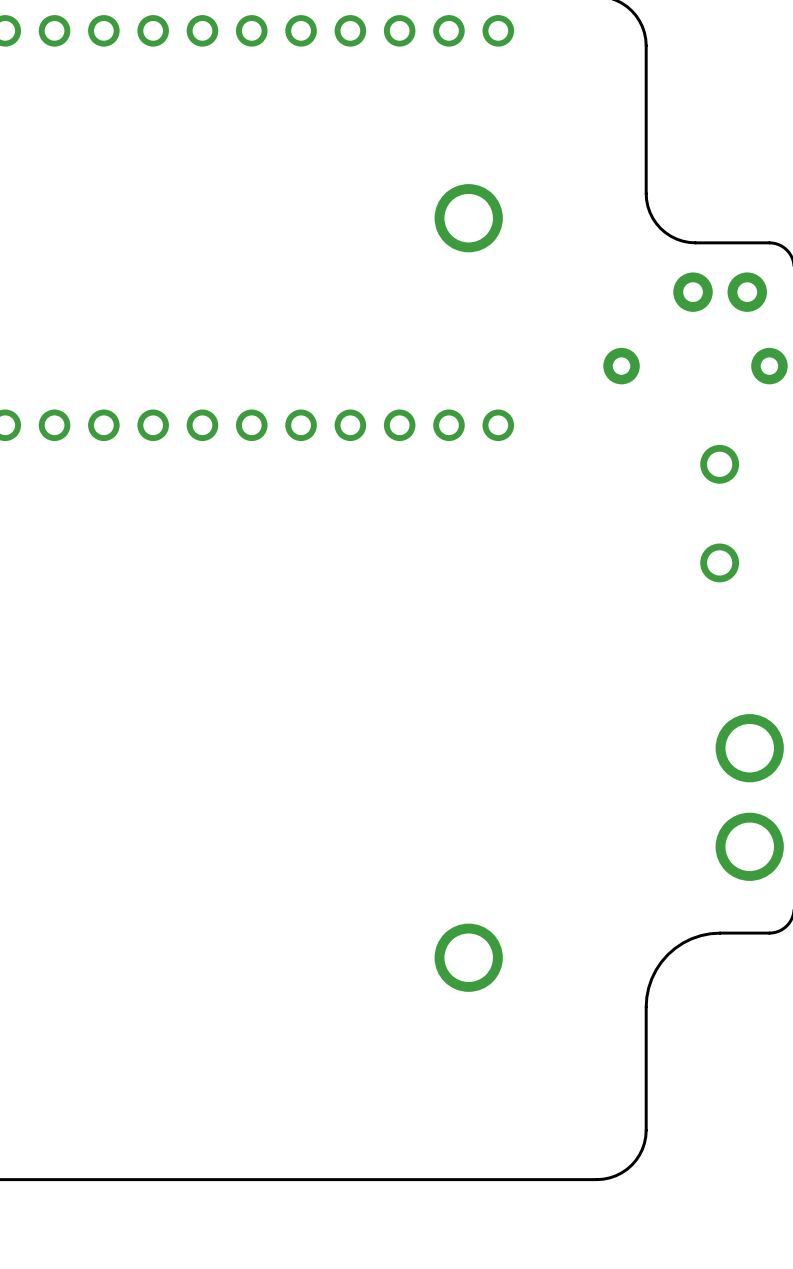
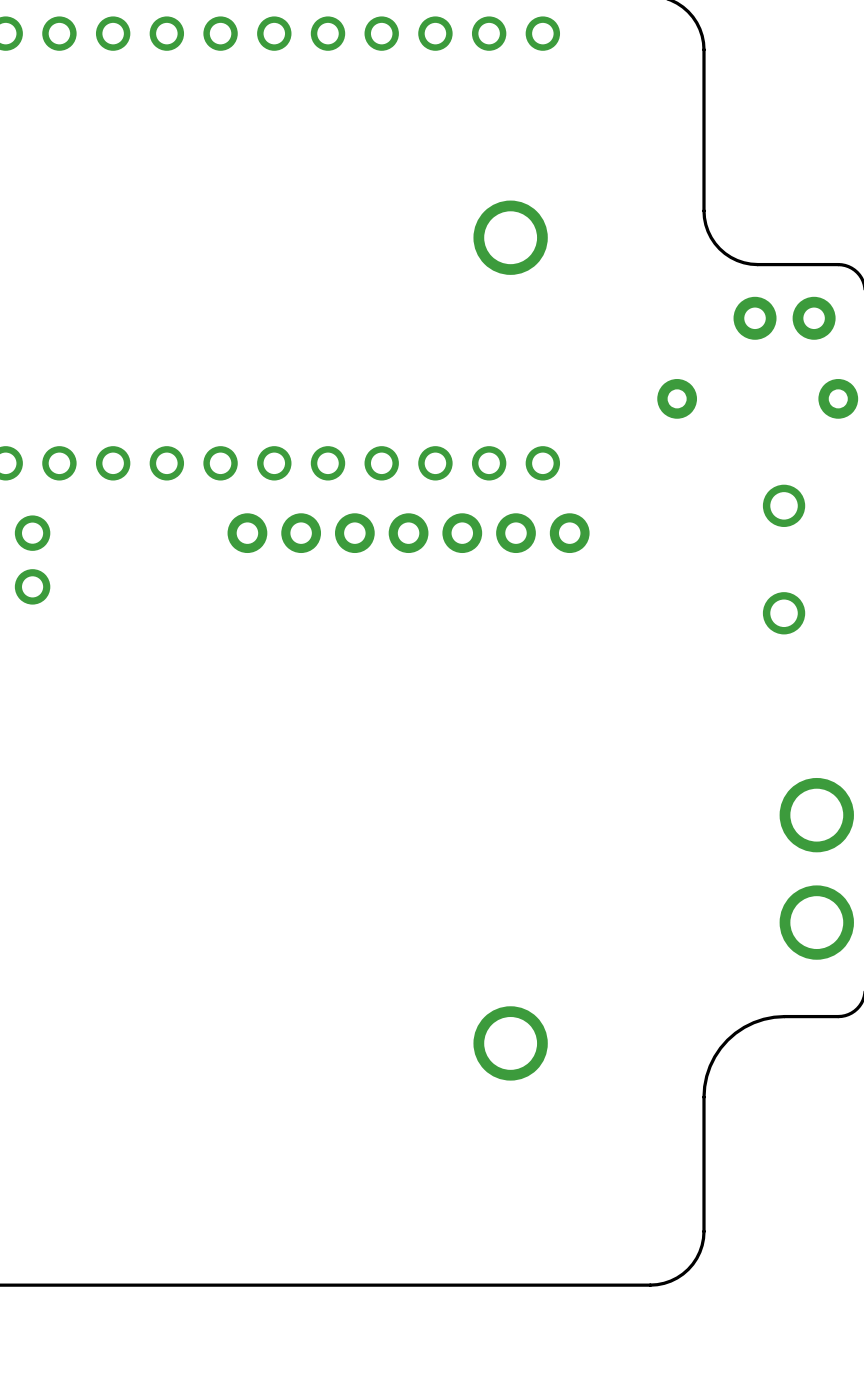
part: none -> (408, 533)
part: none -> (32, 560)

